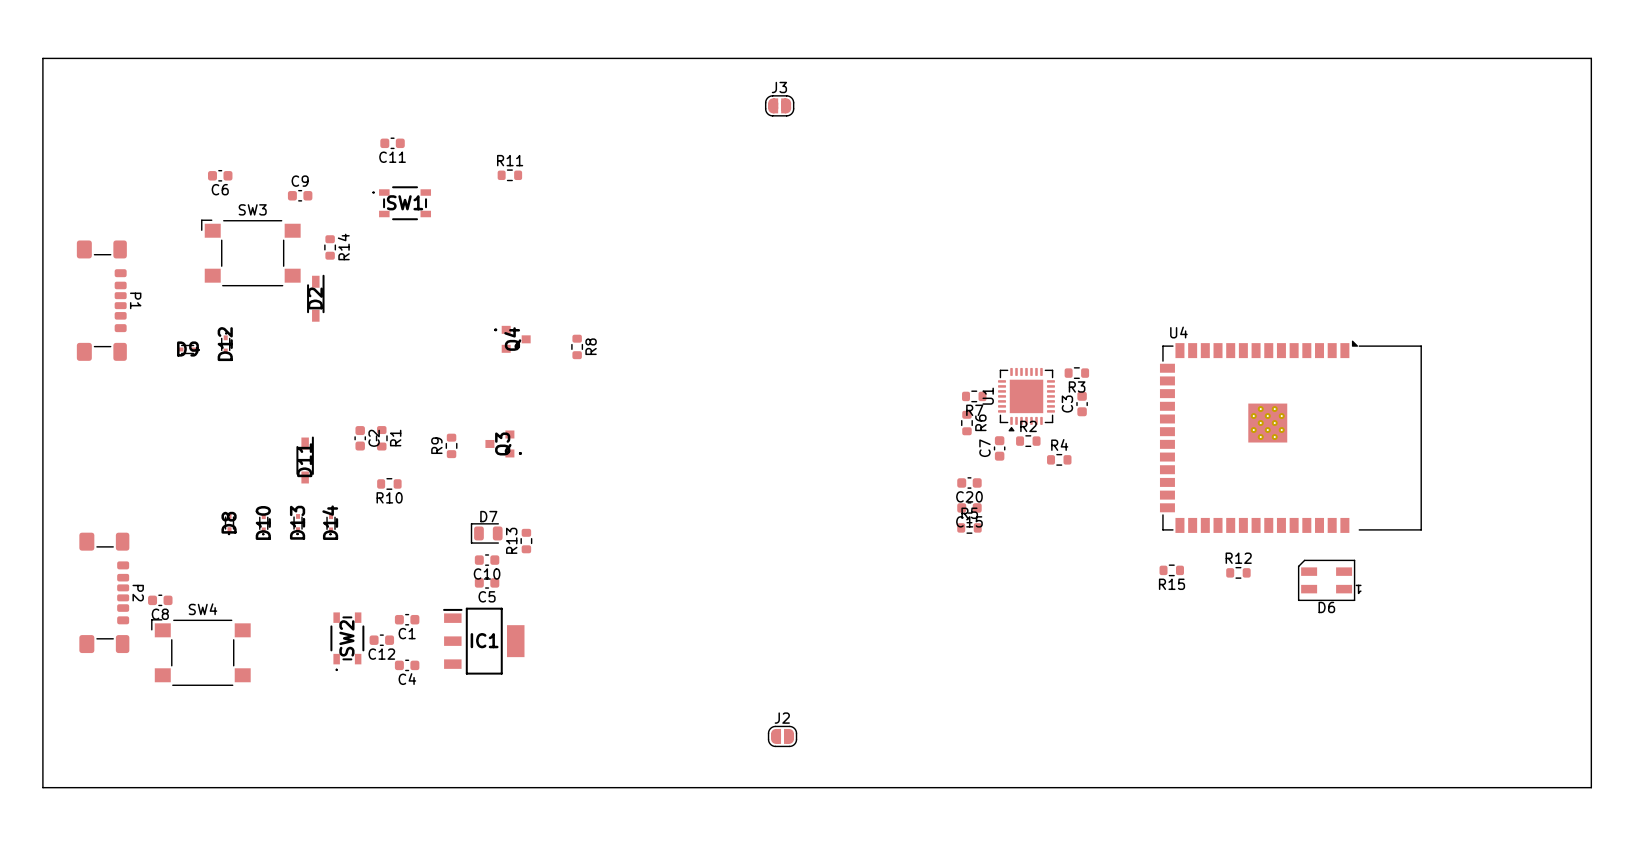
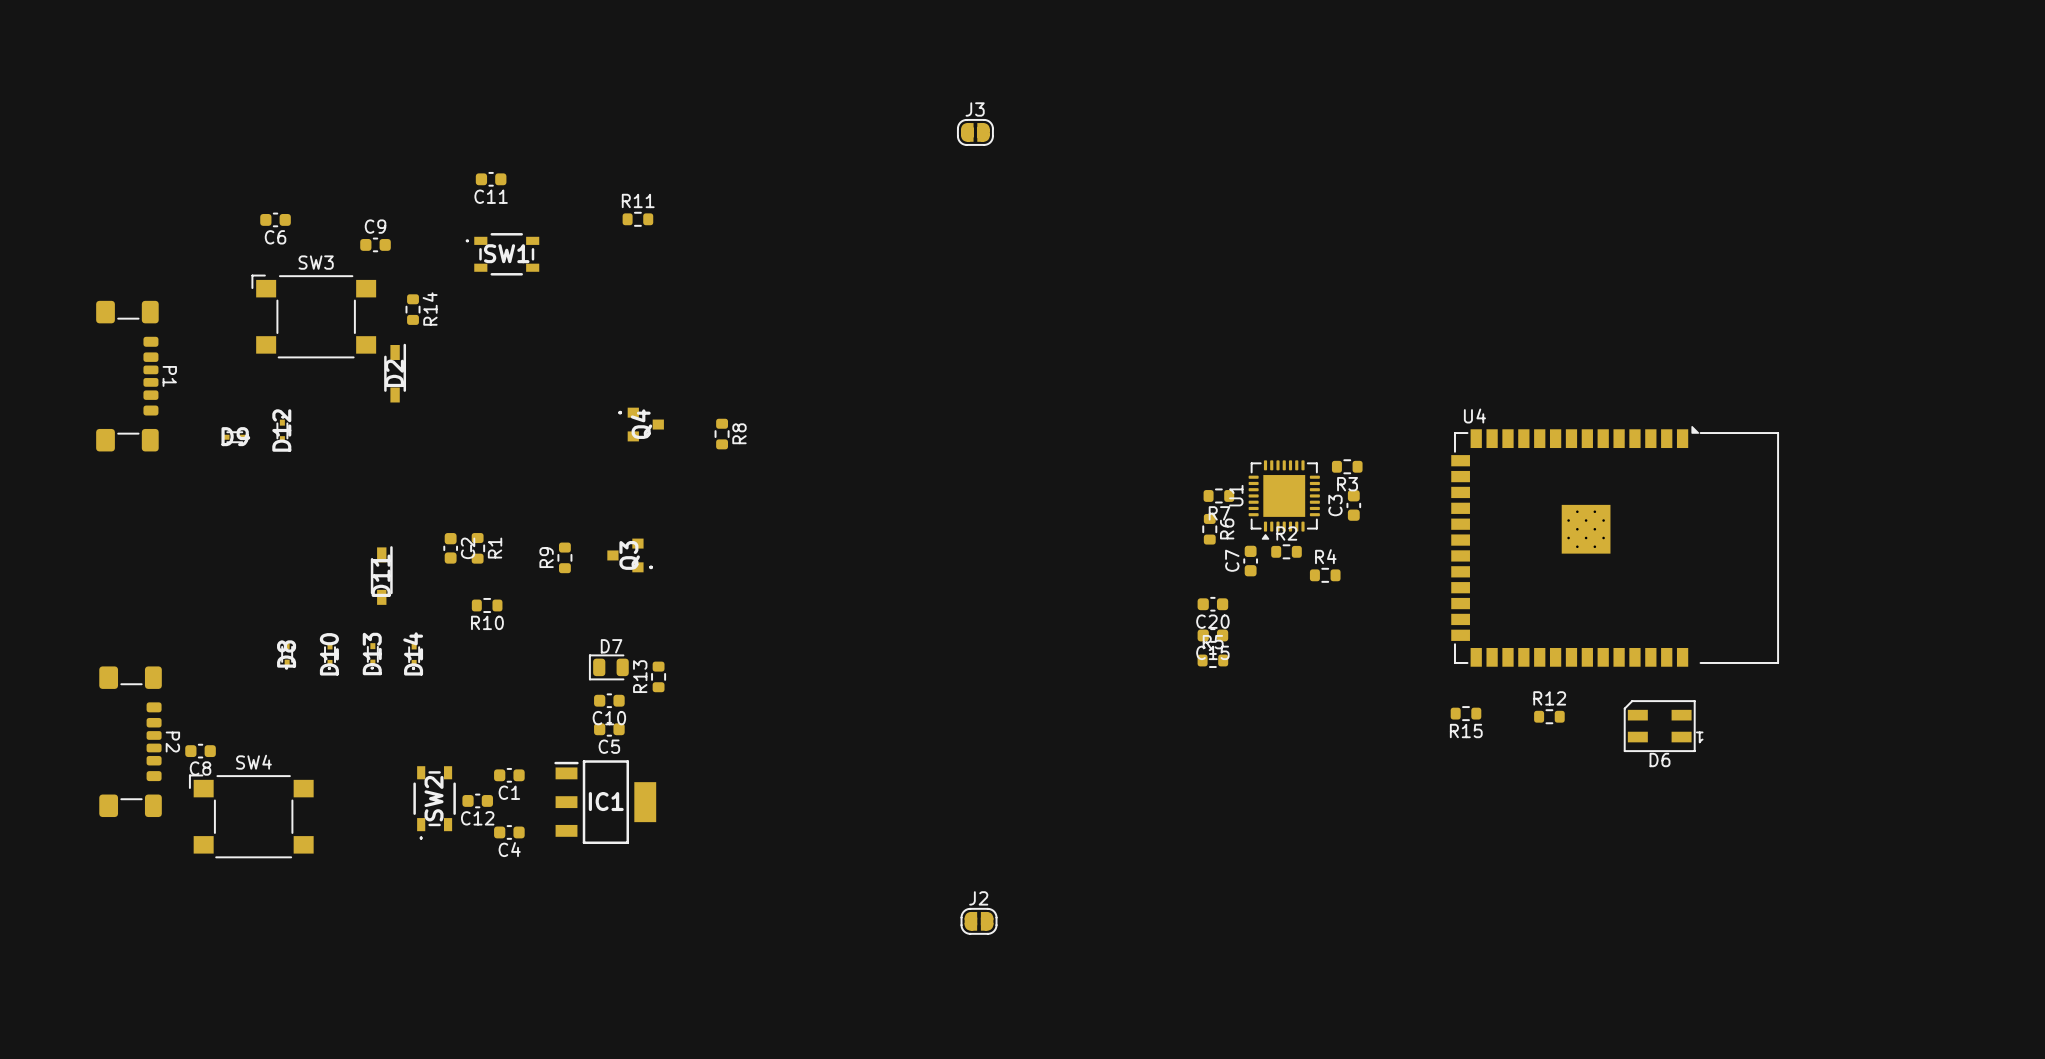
board edge: (42, 58) (1591, 58) (1591, 787) (42, 787) (42, 58) -> none

